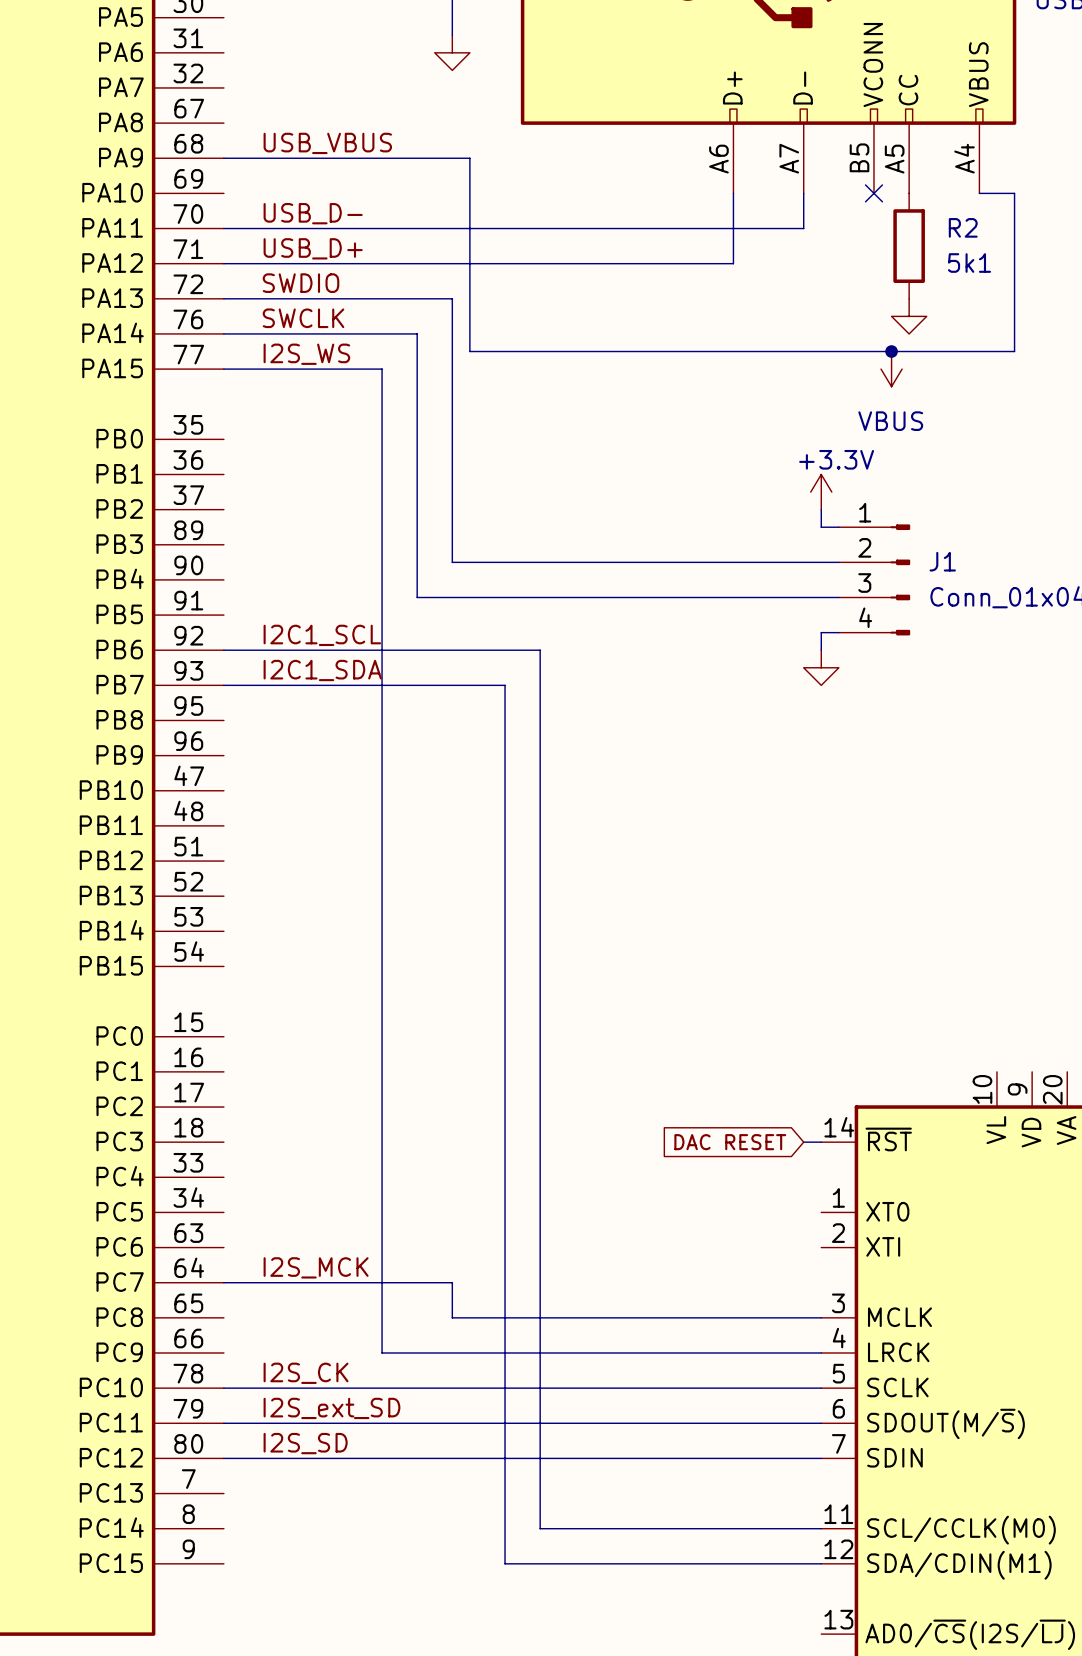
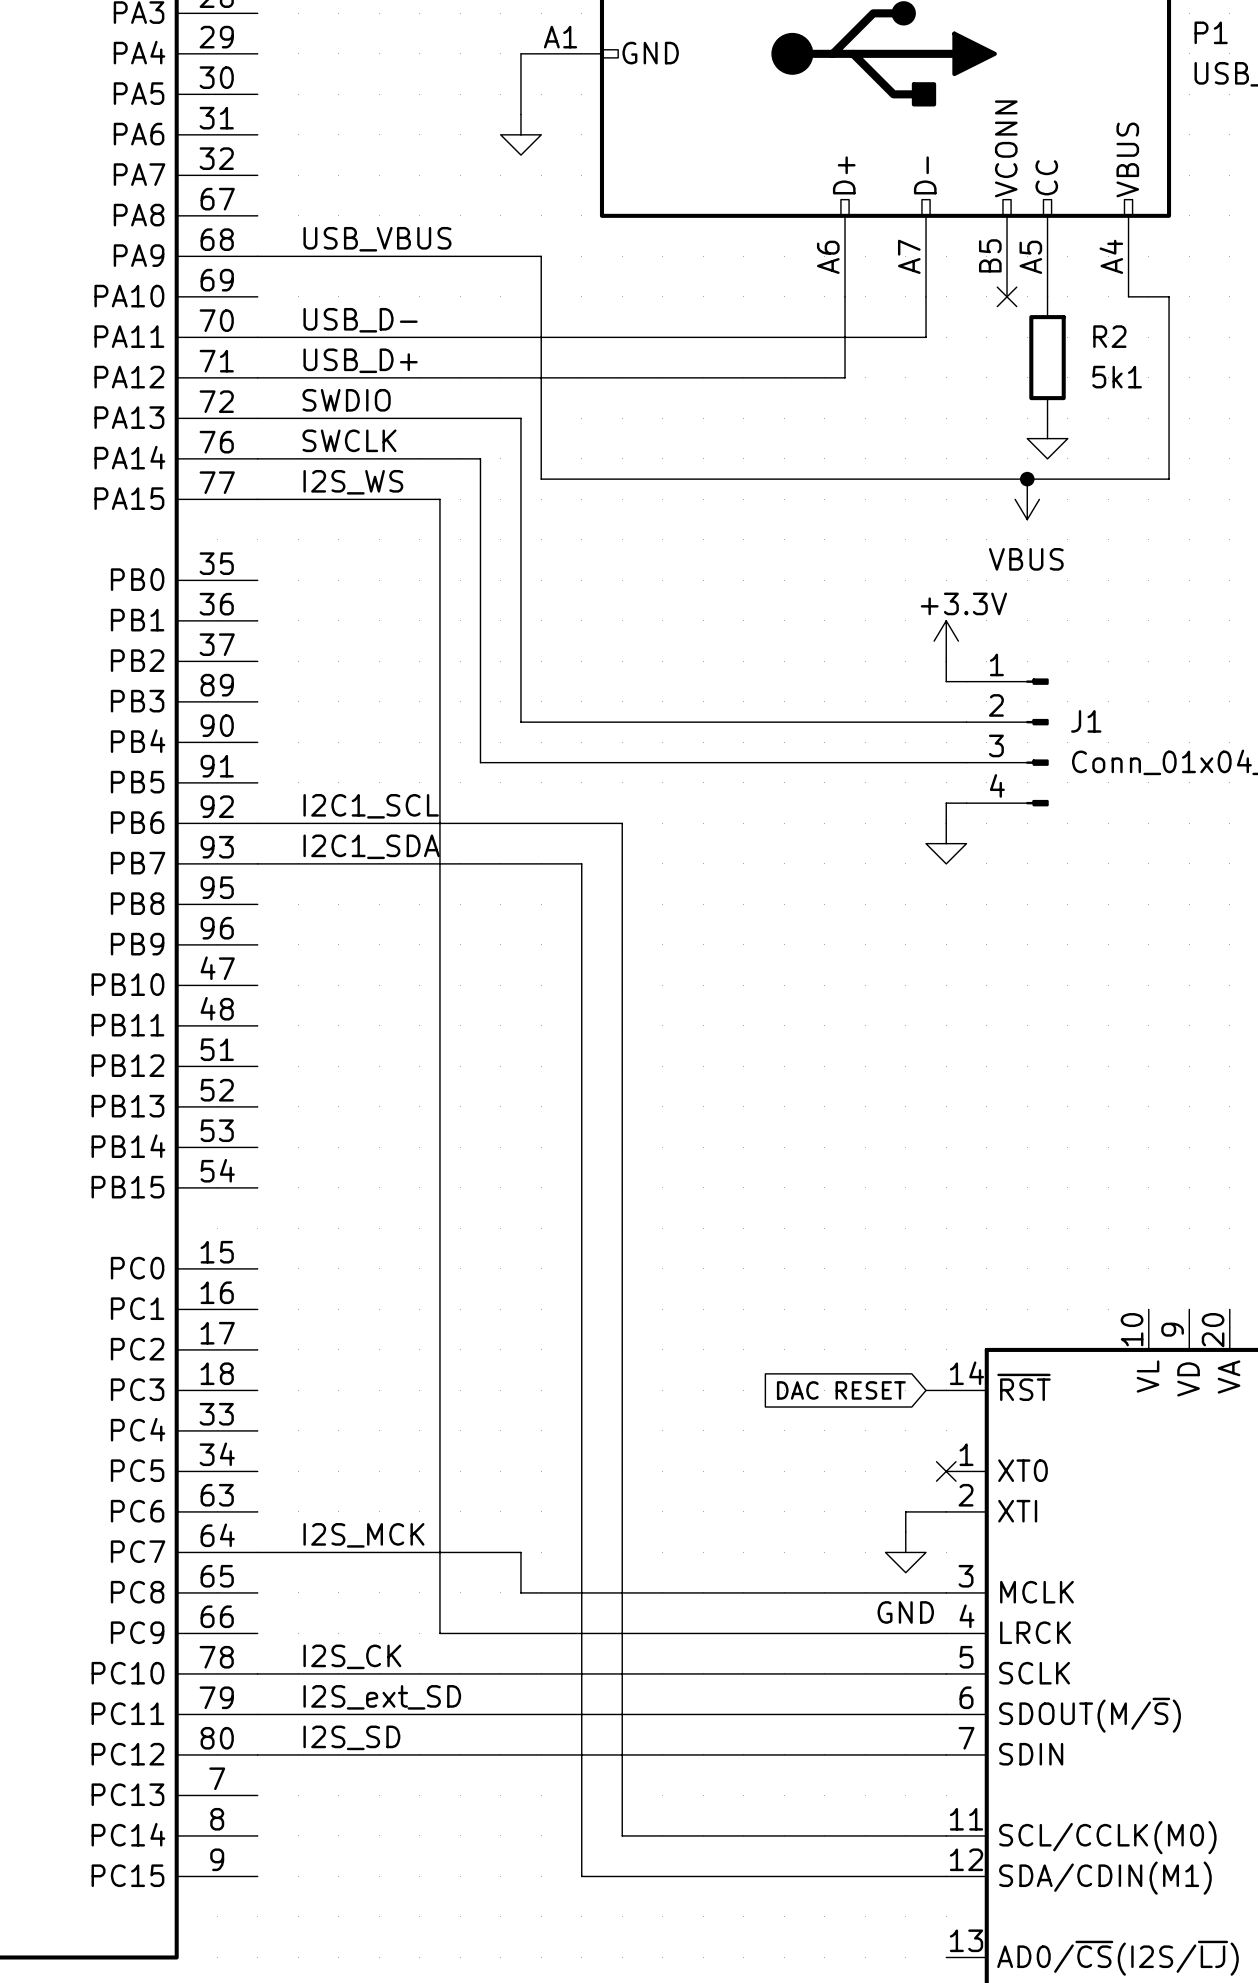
no-connect mark: none -> (946, 1471)
wire: none -> (946, 1511) (905, 1511) (905, 1532)
power symbol: none -> GND (905, 1552)

